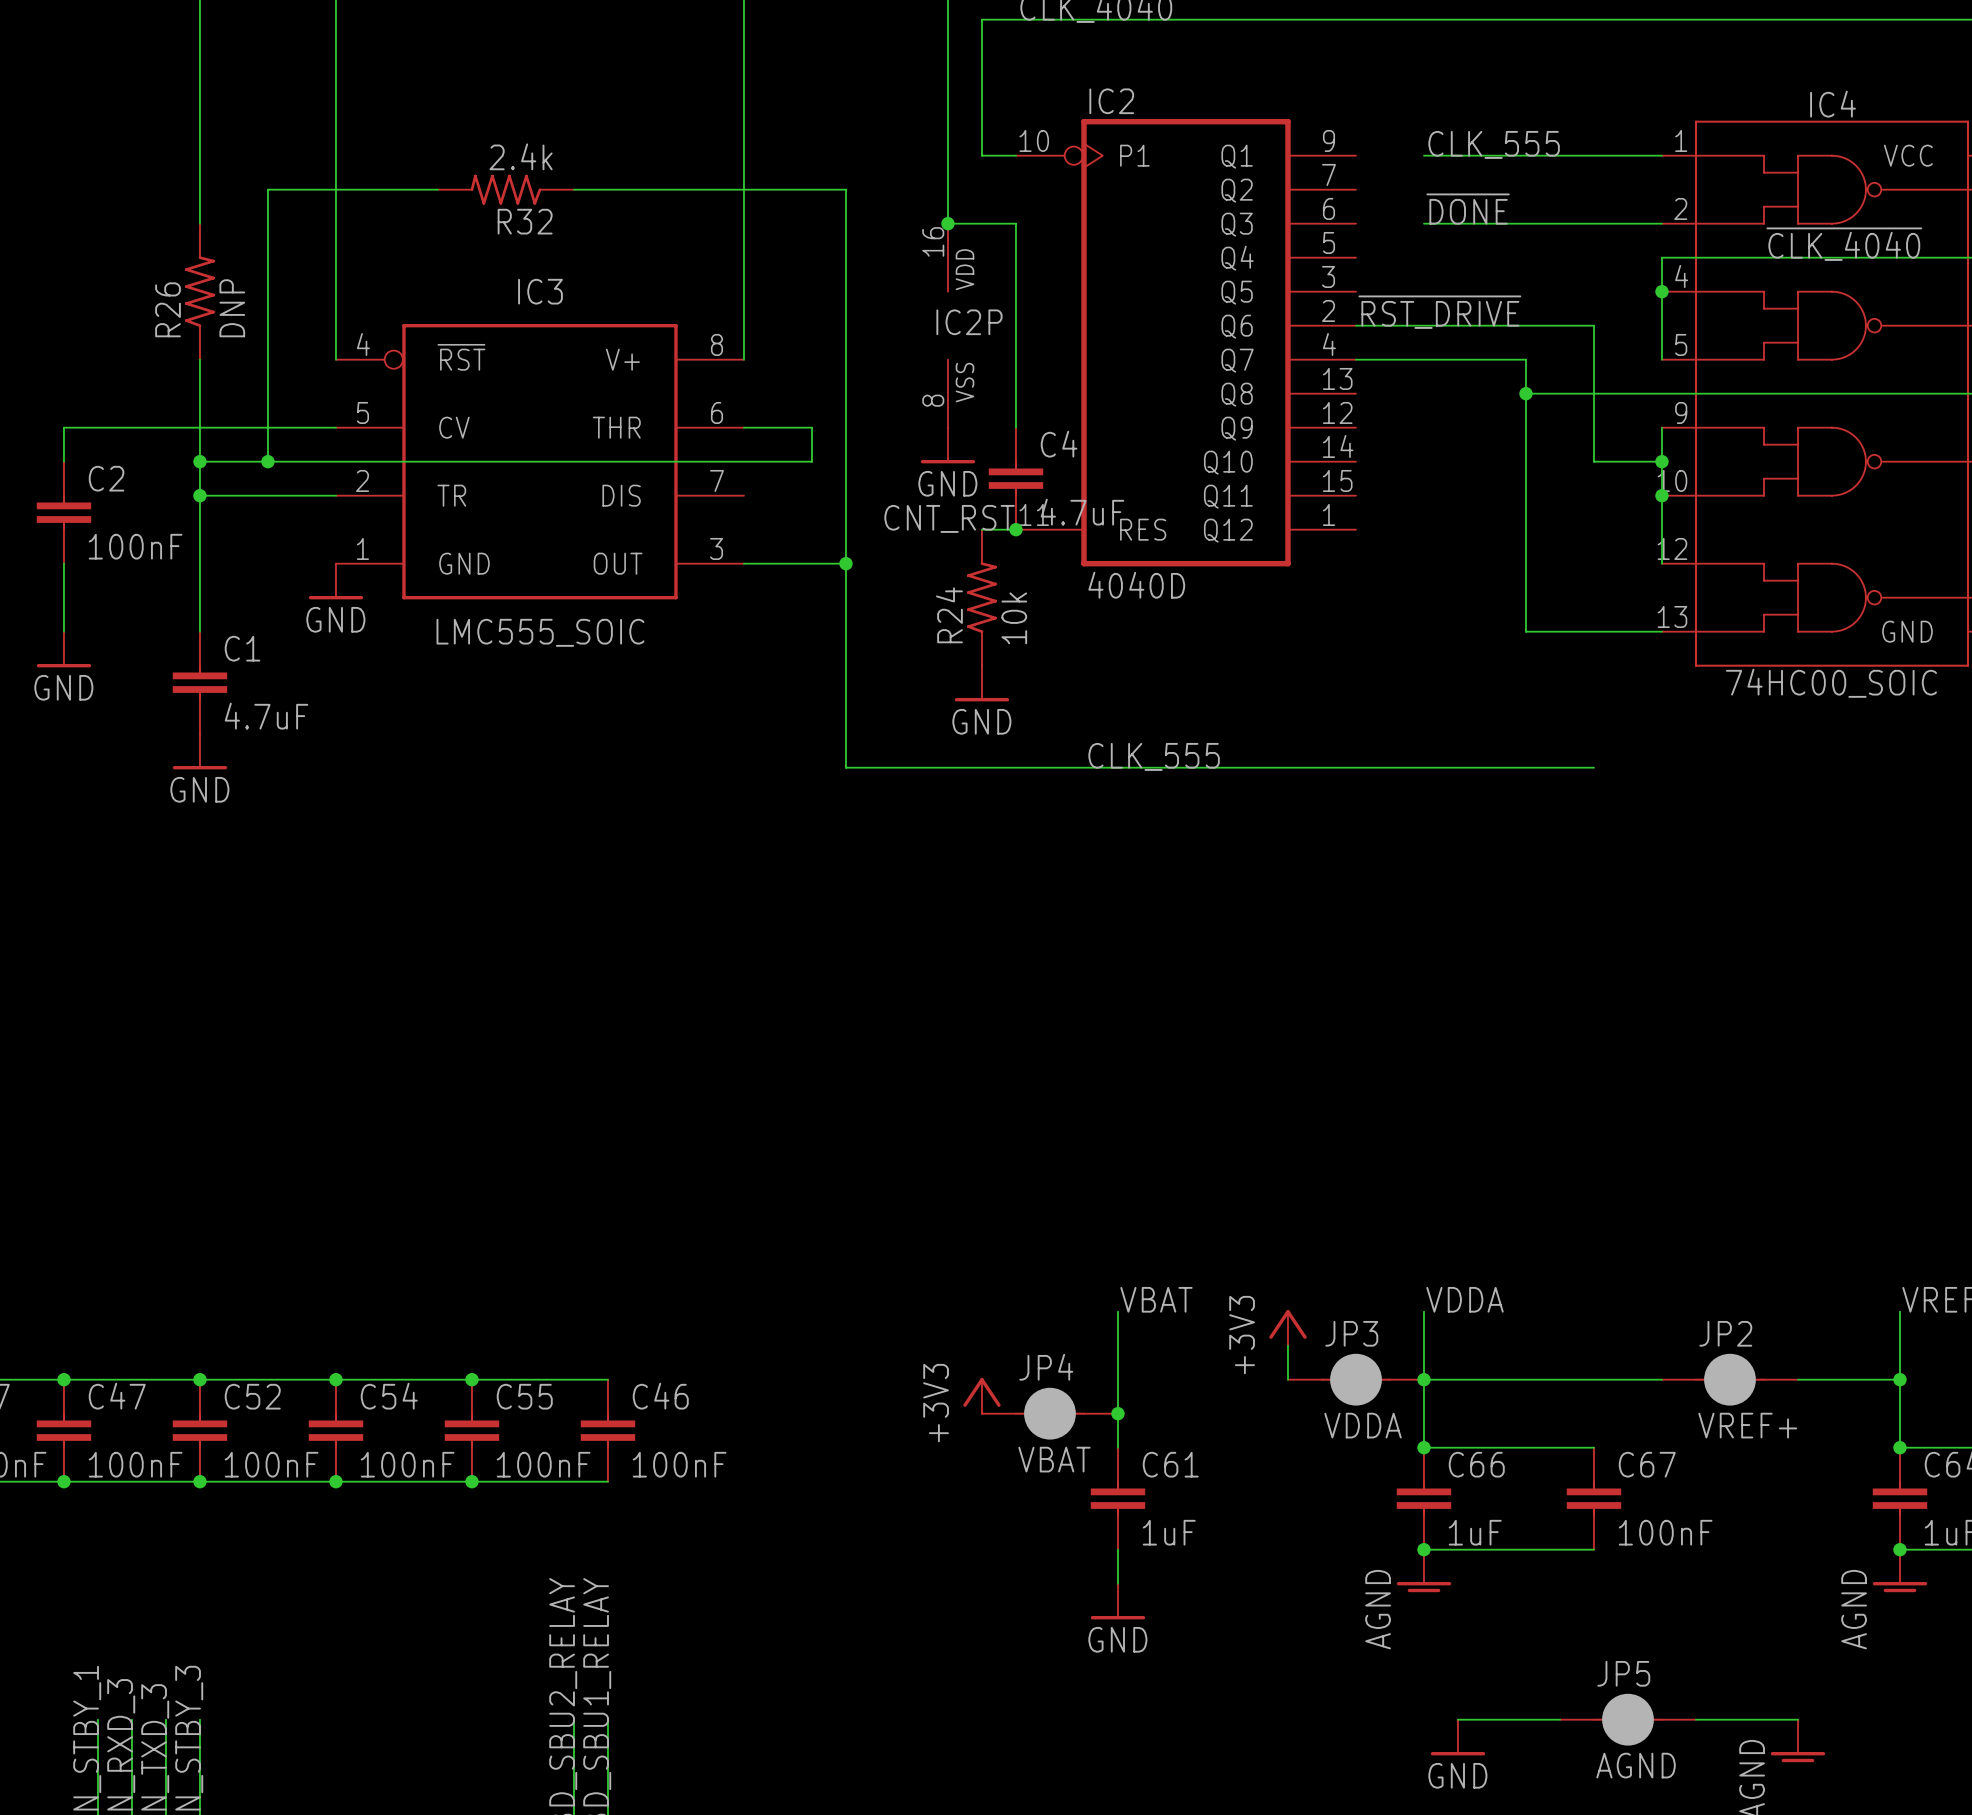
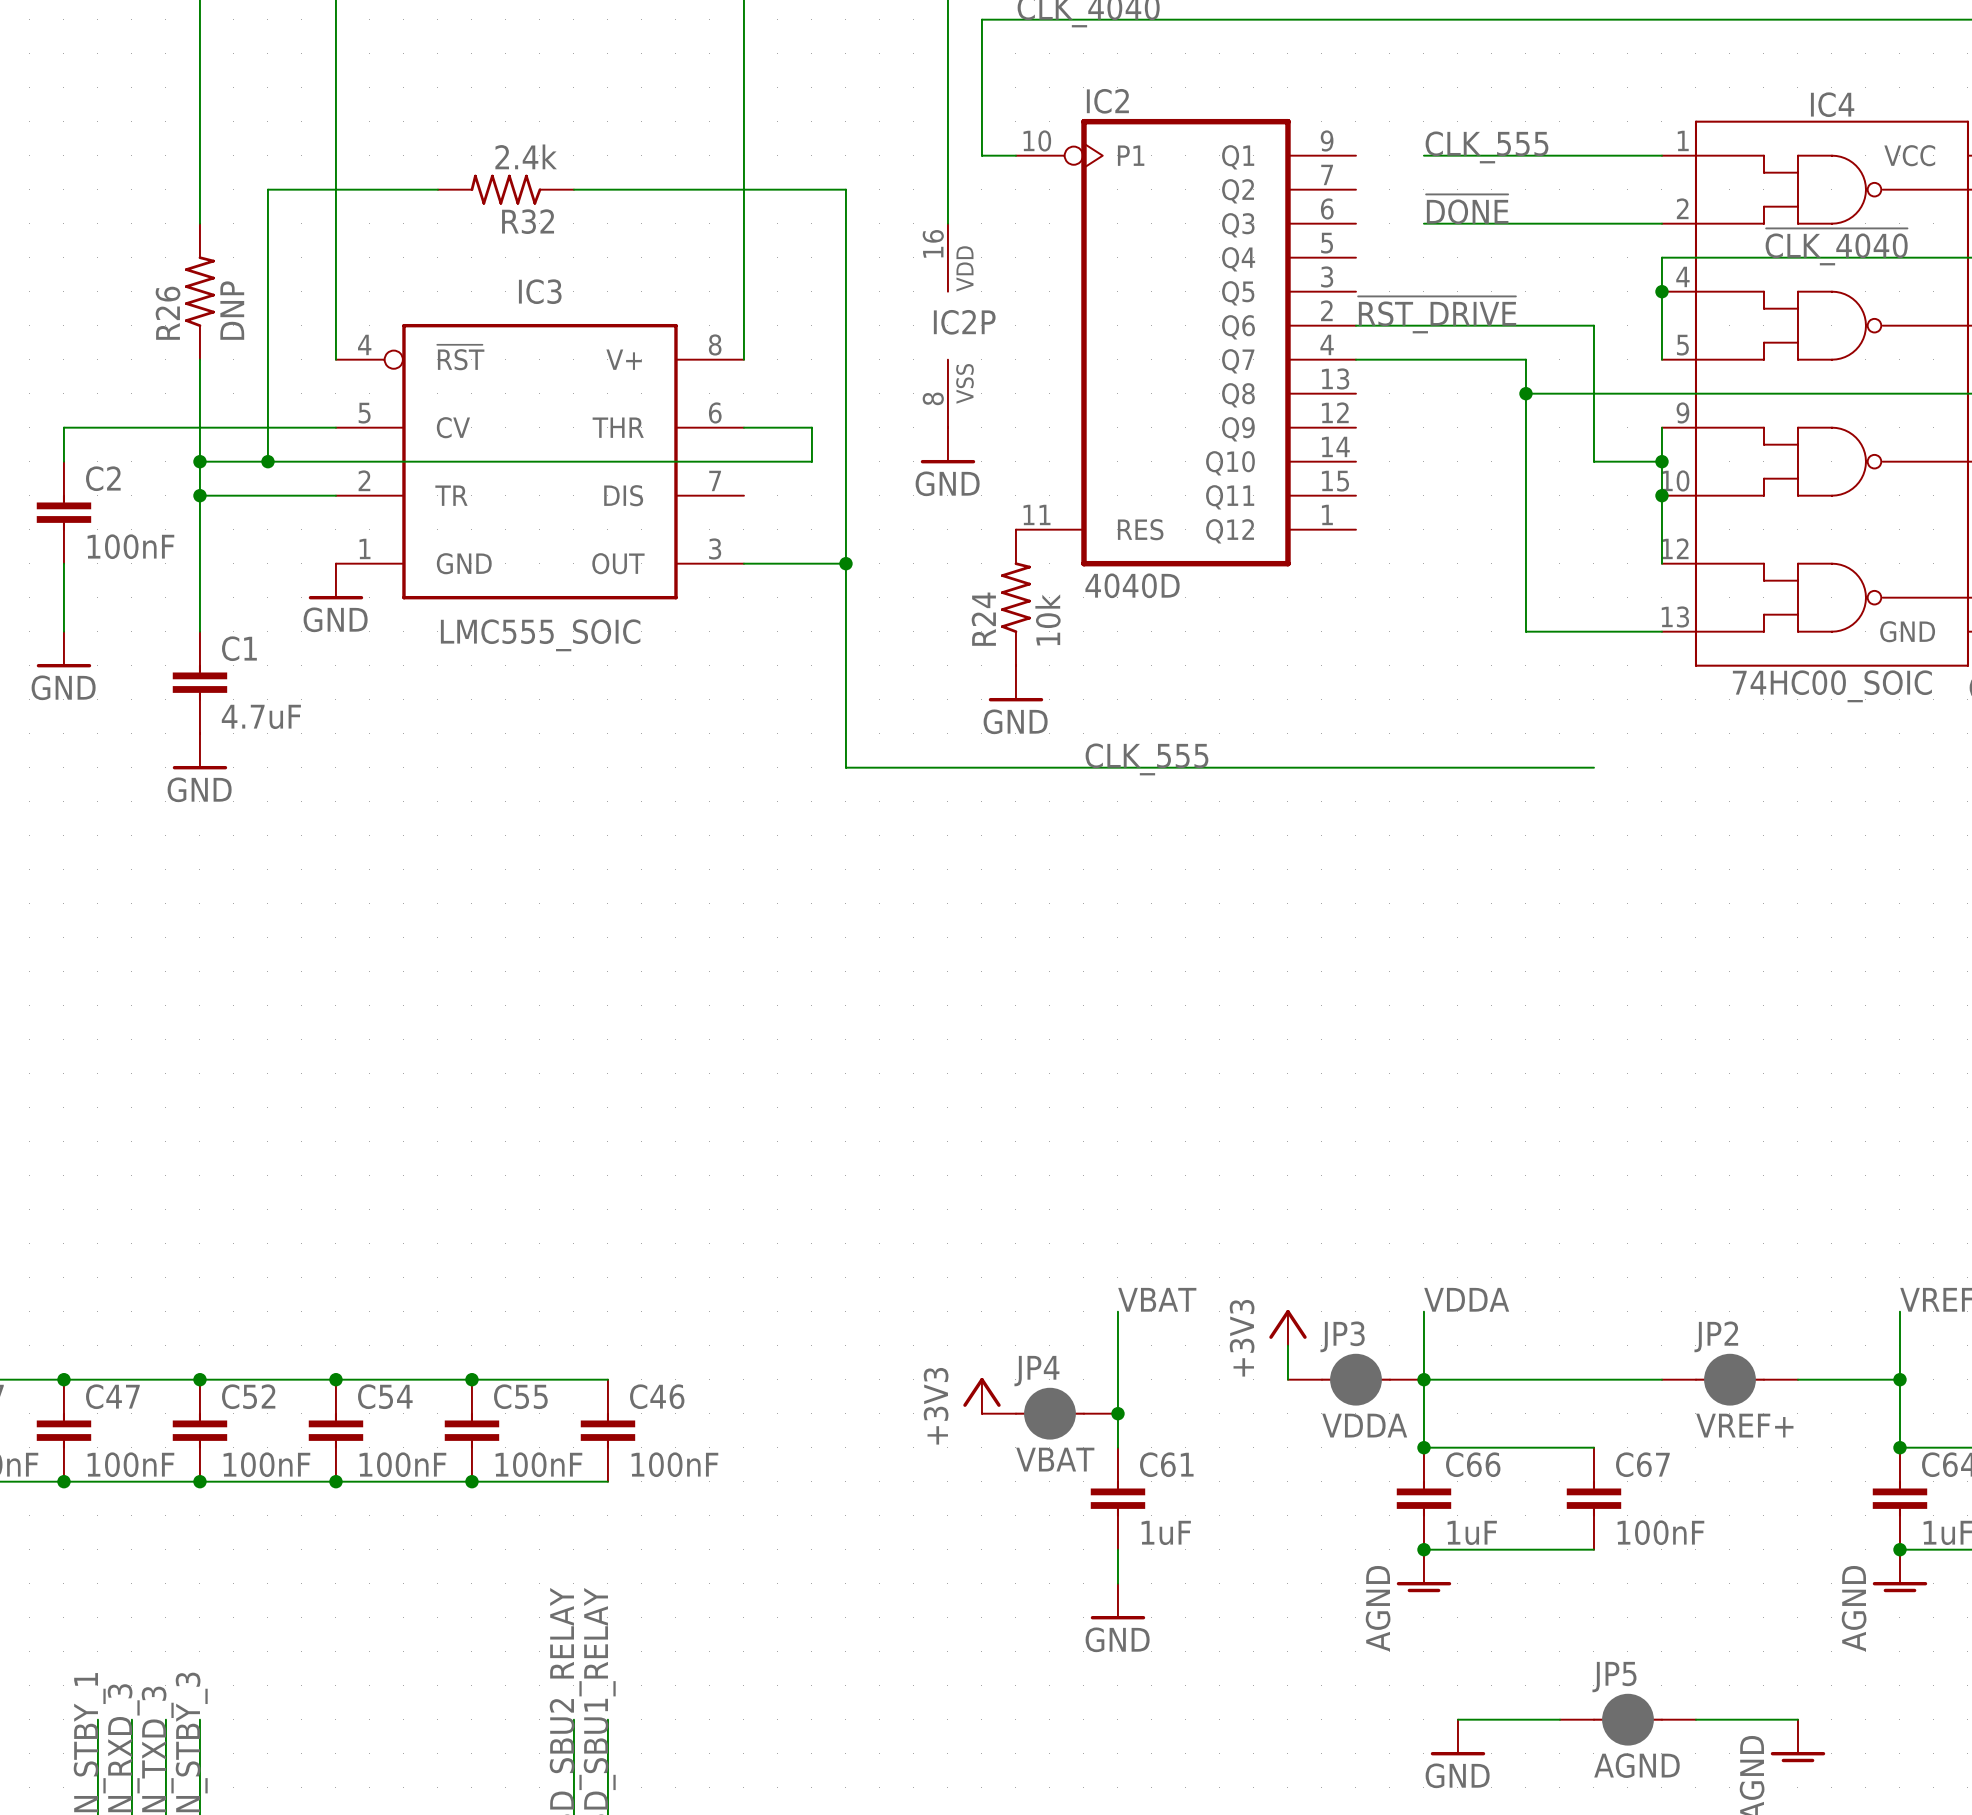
wire: (947, 223) (1015, 223) (1015, 427) -> none
junction: (947, 223) -> none
C4: 4.7uF (1015, 478) -> none
label: CNT_RST (949, 518) -> none
wire: (981, 529) (1015, 529) -> none
junction: (1015, 529) -> none
R24 position: (981, 597) -> (1015, 597)
power symbol position: GND (981, 683) -> GND (1015, 683)

